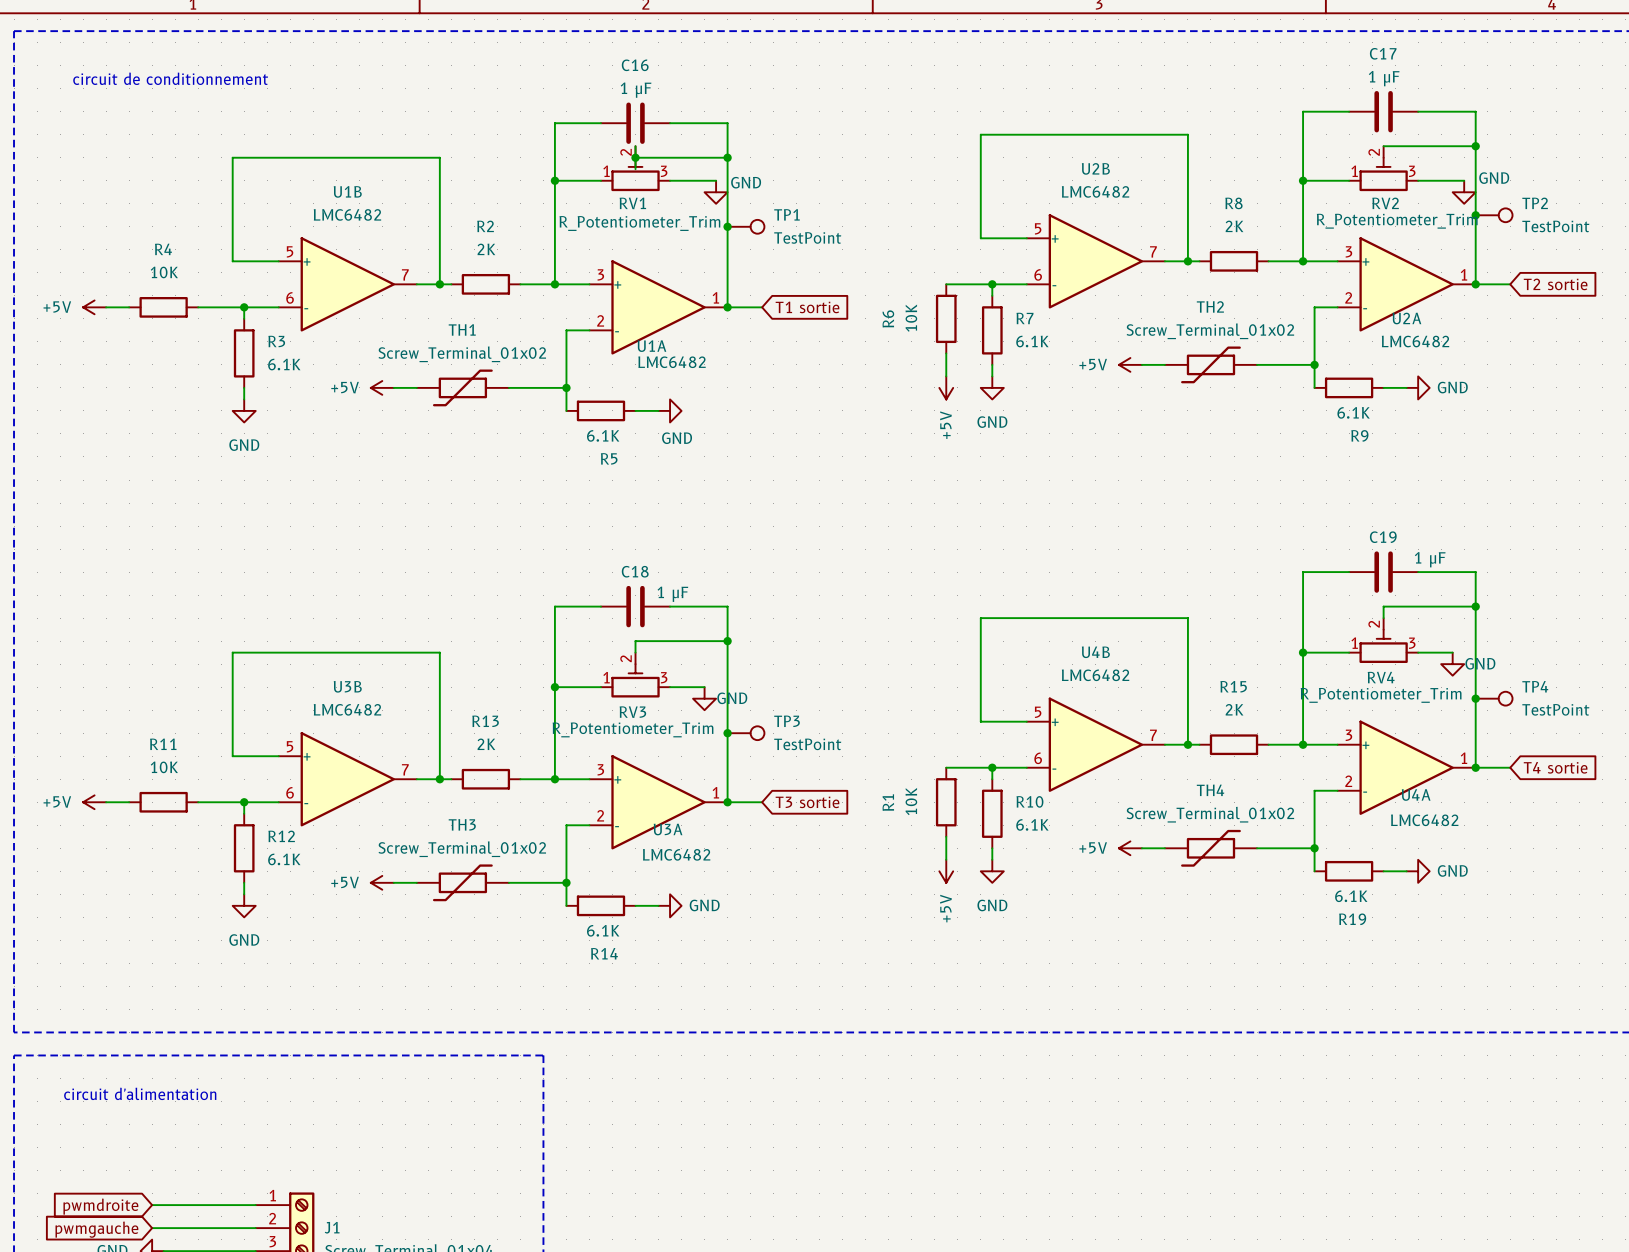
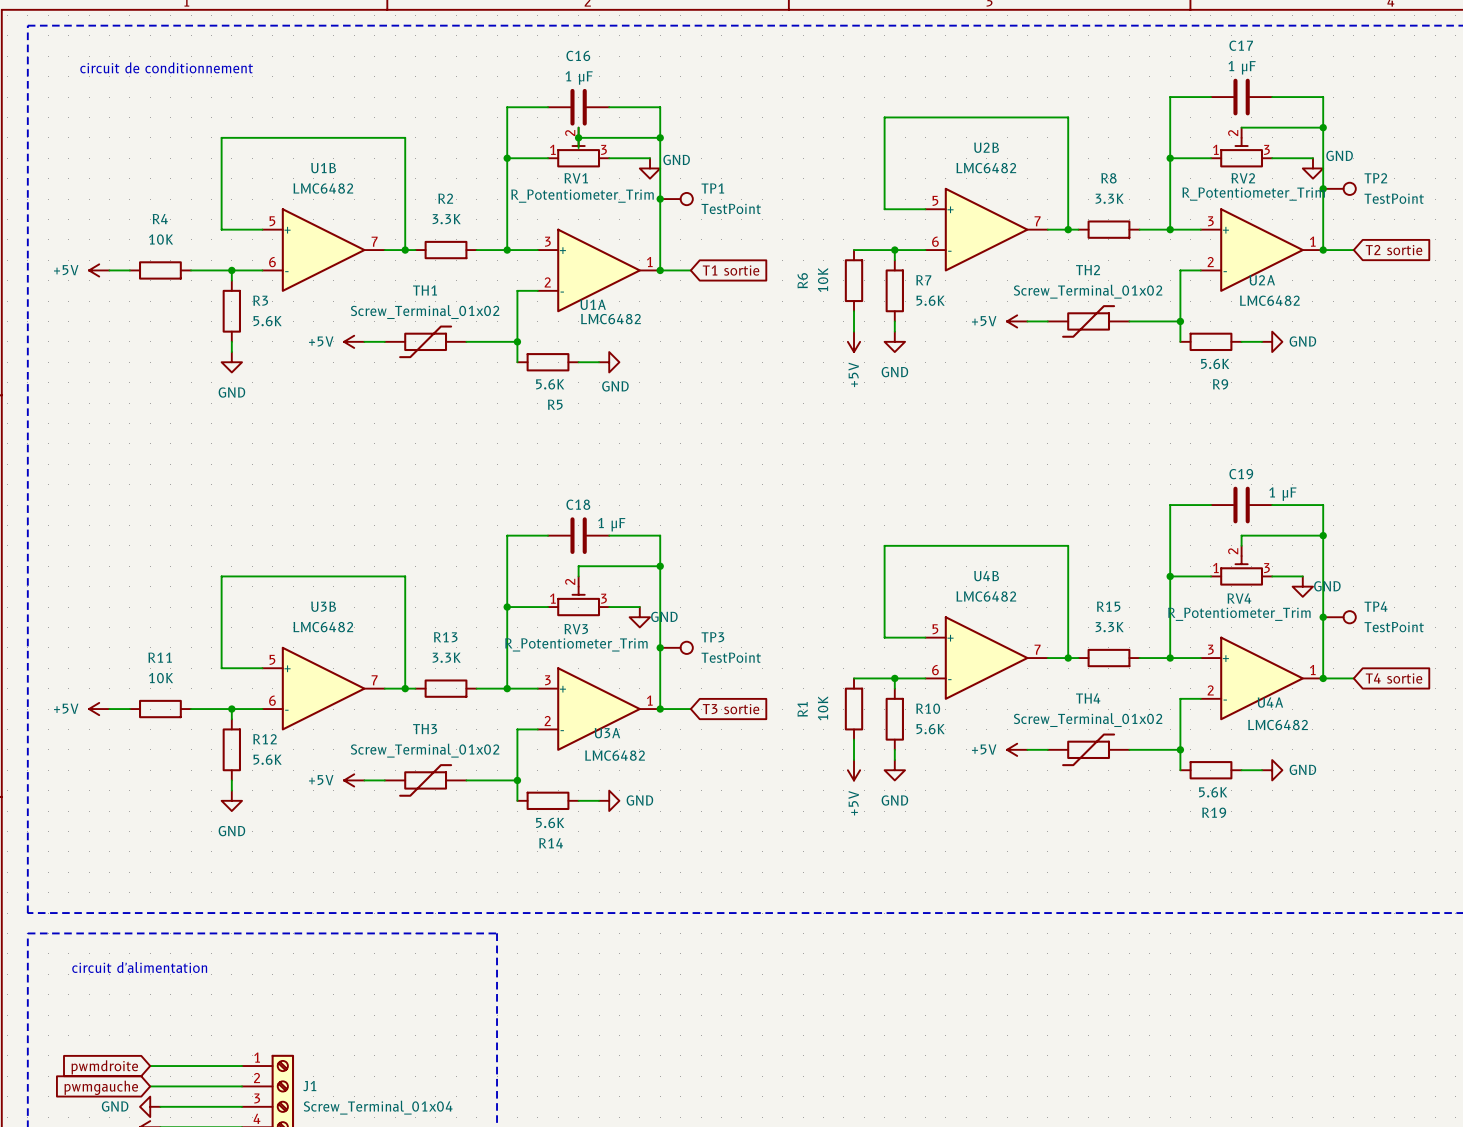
R8 value: 2K (1234, 226) -> 3.3K (1109, 198)
R2 value: 2K (486, 249) -> 3.3K (446, 219)
R7 value: 6.1K (1032, 341) -> 5.6K (930, 300)
R3 value: 6.1K (284, 364) -> 5.6K (267, 321)
R9 value: 6.1K (1353, 412) -> 5.6K (1215, 363)
R5 value: 6.1K (603, 435) -> 5.6K (550, 384)
R15 value: 2K (1234, 709) -> 3.3K (1109, 627)
R13 value: 2K (486, 744) -> 3.3K (446, 657)
R10 value: 6.1K (1032, 824) -> 5.6K (930, 729)
R12 value: 6.1K (284, 859) -> 5.6K (267, 759)
R19 value: 6.1K (1351, 896) -> 5.6K (1213, 792)
R14 value: 6.1K (603, 930) -> 5.6K (550, 822)

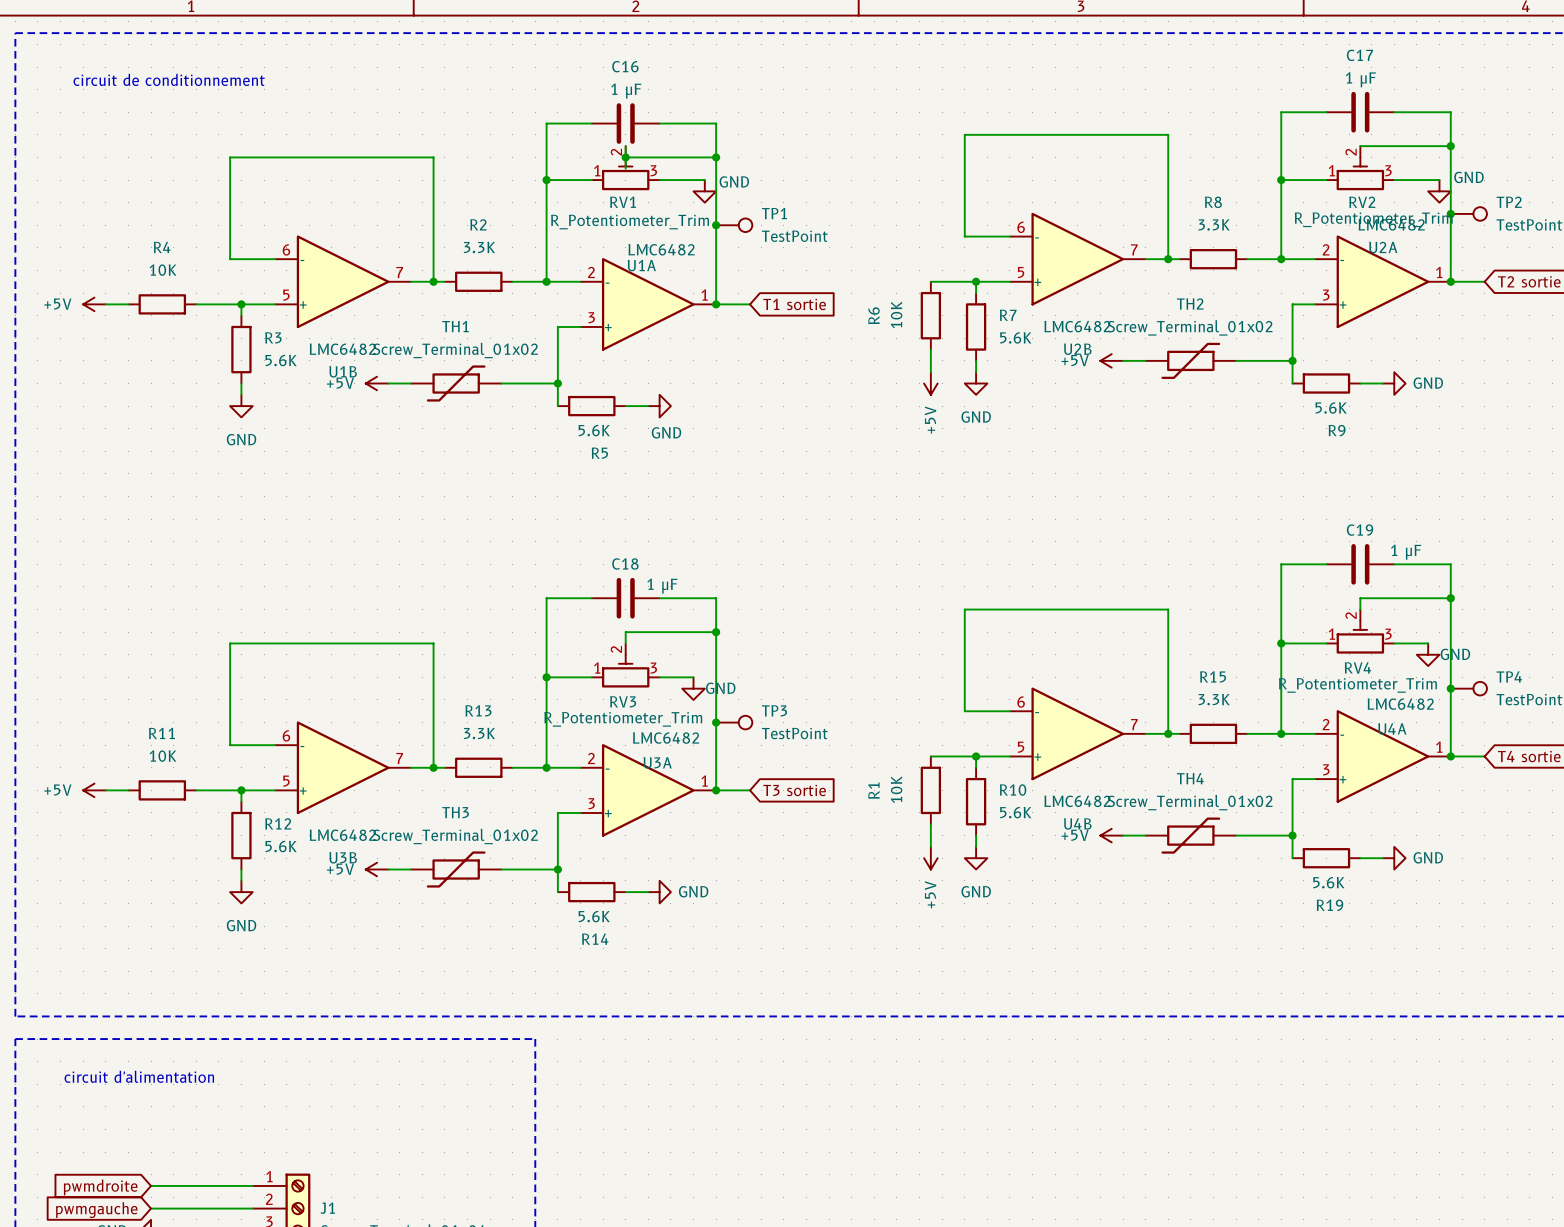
U2B flip: as is (986, 229) -> up-down (1077, 259)
U1B flip: as is (323, 250) -> up-down (343, 281)
U2A flip: as is (1261, 250) -> up-down (1382, 281)
U1A flip: as is (599, 270) -> up-down (648, 304)
U4B flip: as is (986, 658) -> up-down (1077, 733)
U4A flip: as is (1261, 678) -> up-down (1382, 756)
U3B flip: as is (323, 688) -> up-down (343, 767)
U3A flip: as is (599, 709) -> up-down (648, 790)

